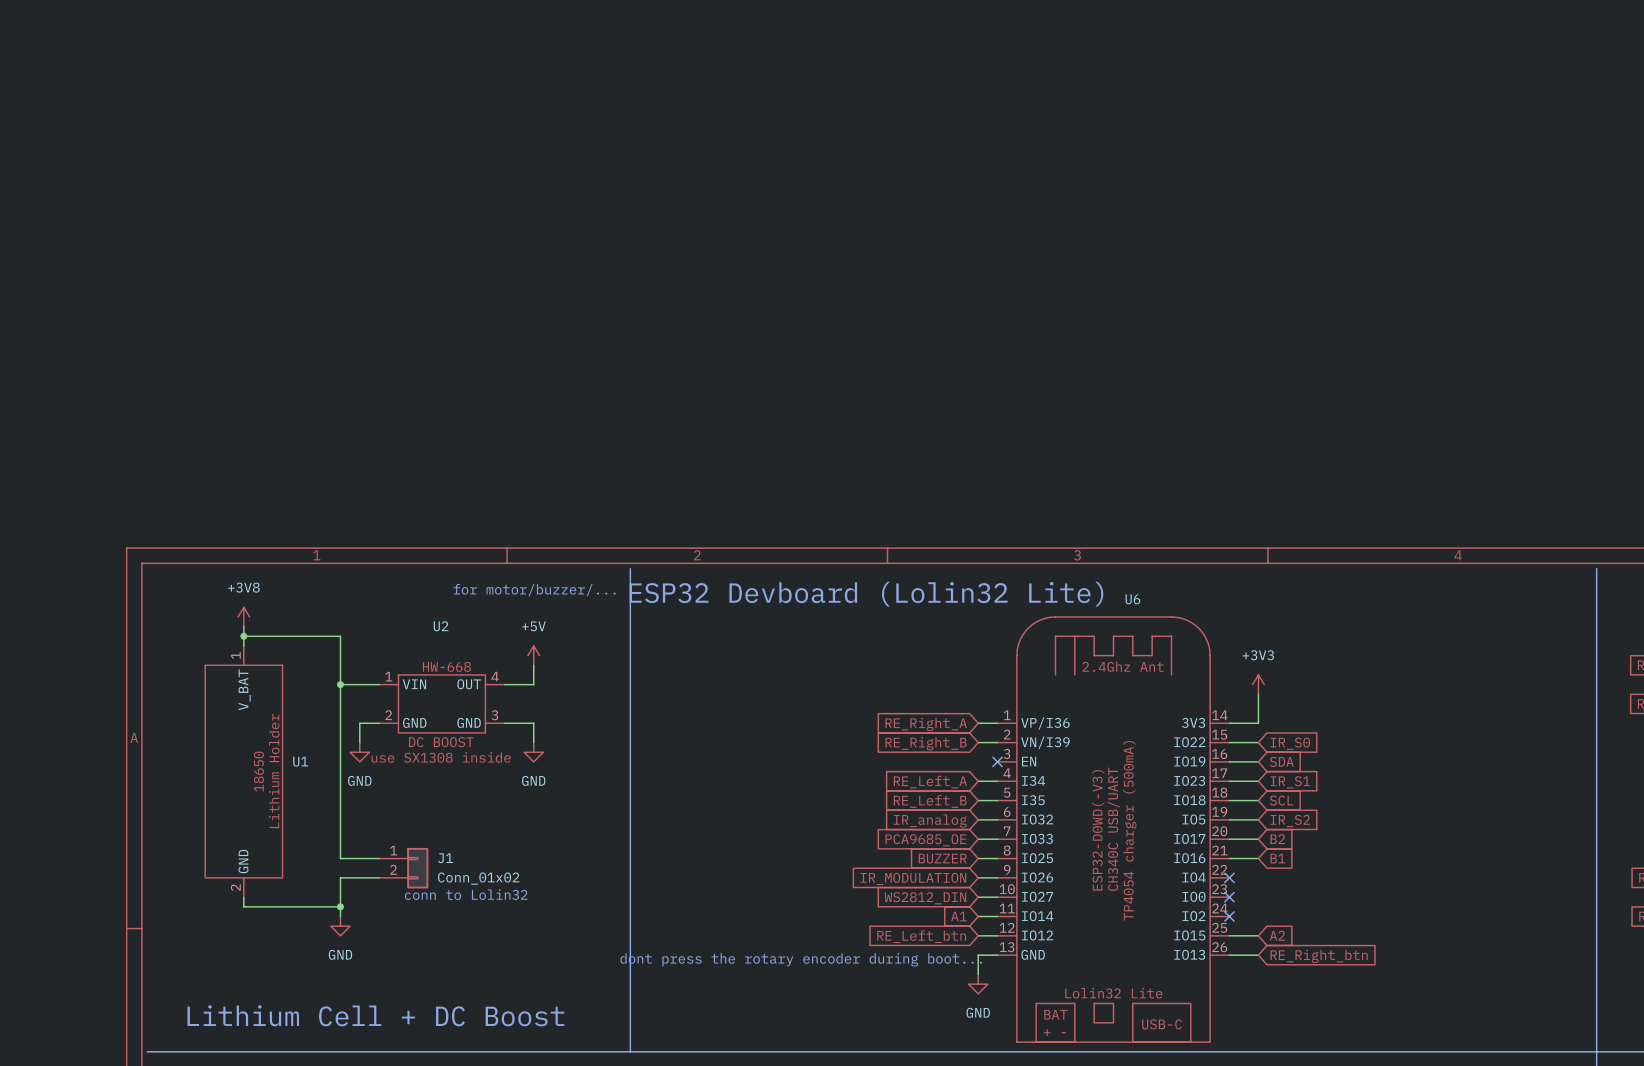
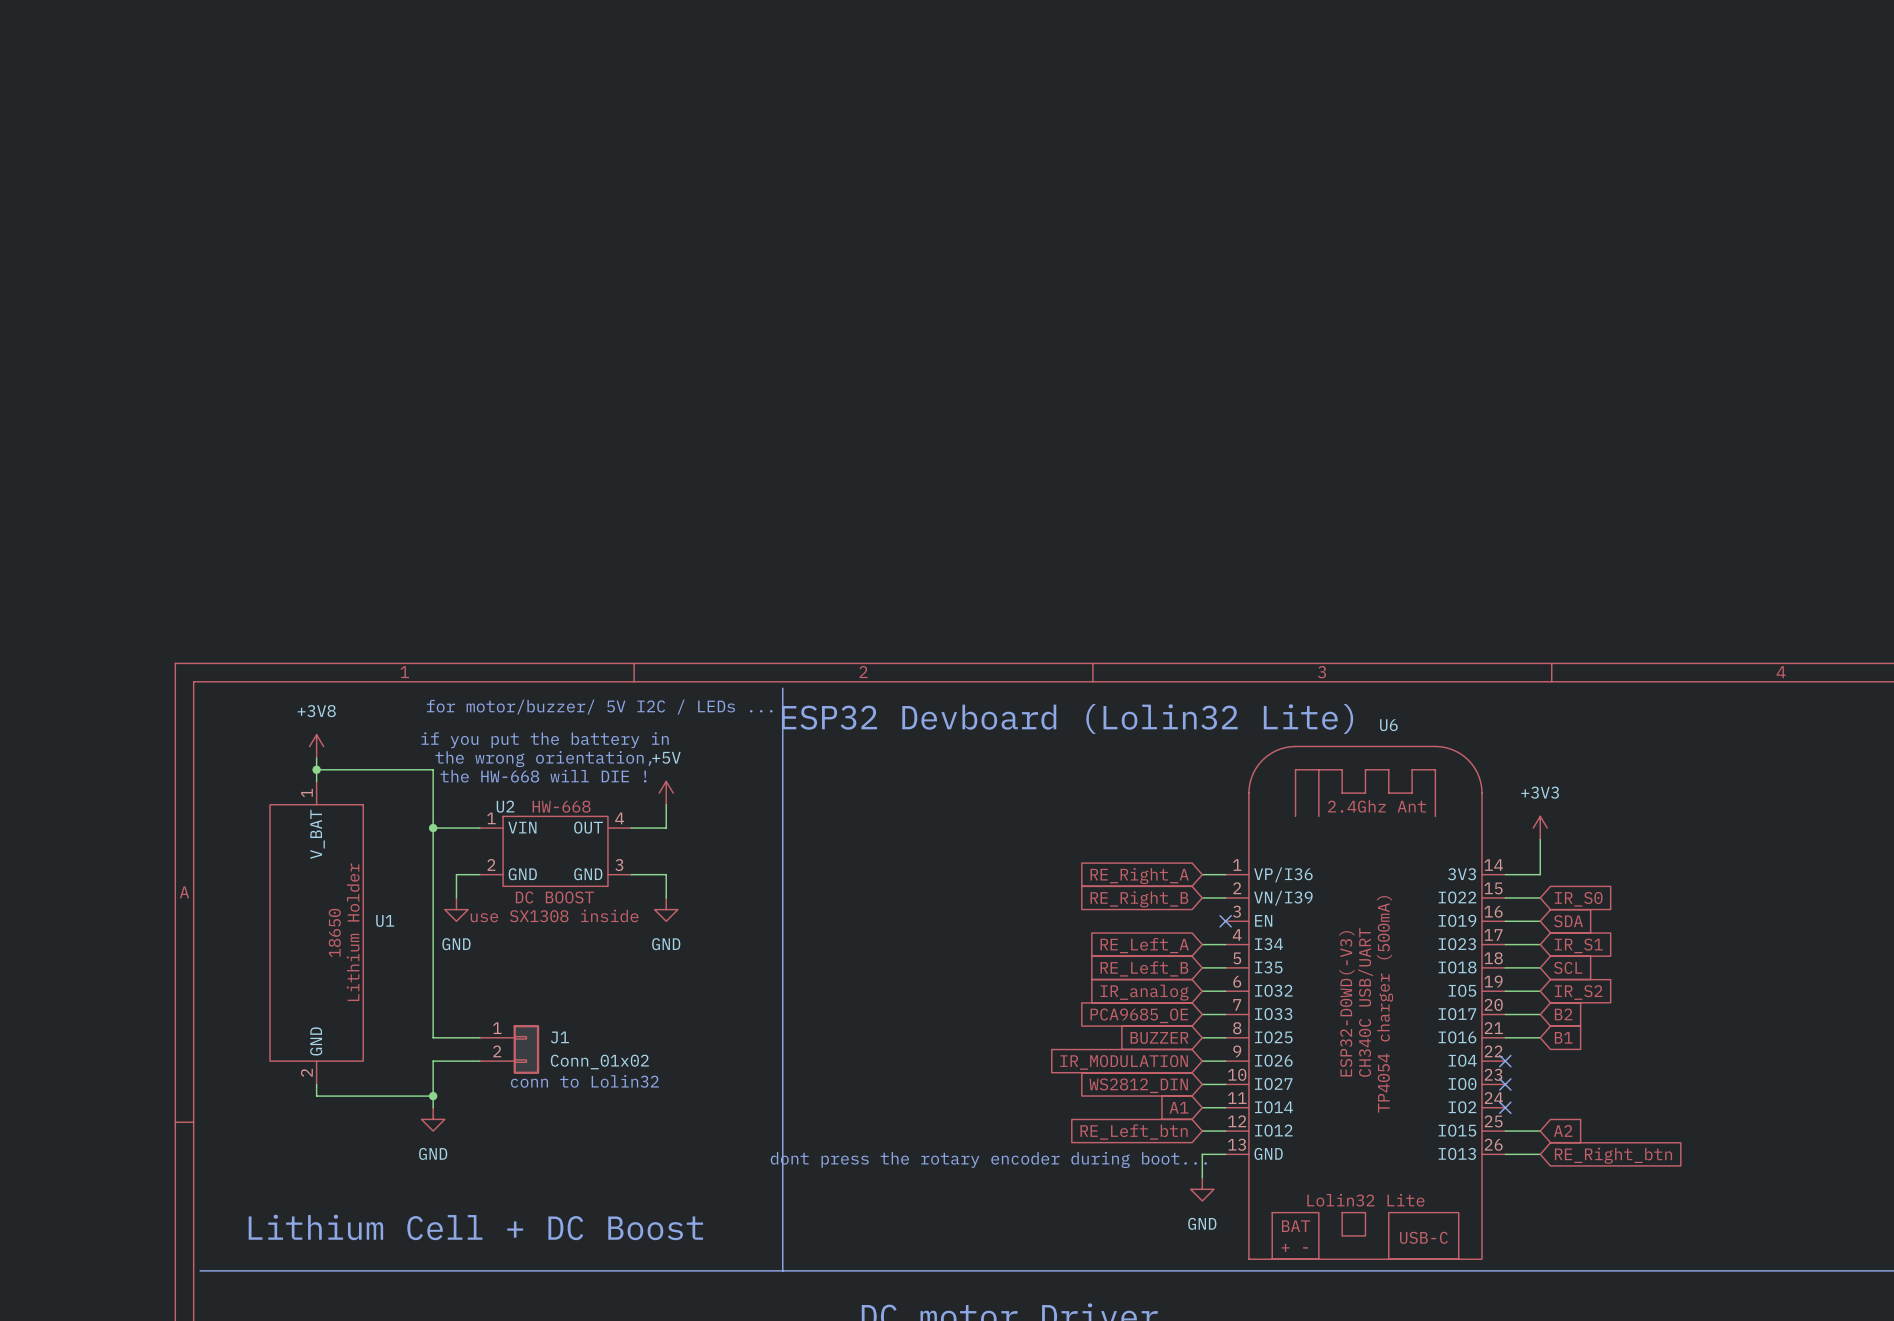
text: for motor/buzzer/... (534, 590) -> for motor/buzzer/ 5V I2C / LEDs ... (599, 707)
text: none -> if you put the battery in (545, 740)
U2 name position: U2 (441, 626) -> U2 (505, 806)
text: none -> the wrong orientation, (543, 759)
text: none -> the HW-668 will DIE ! (543, 776)

